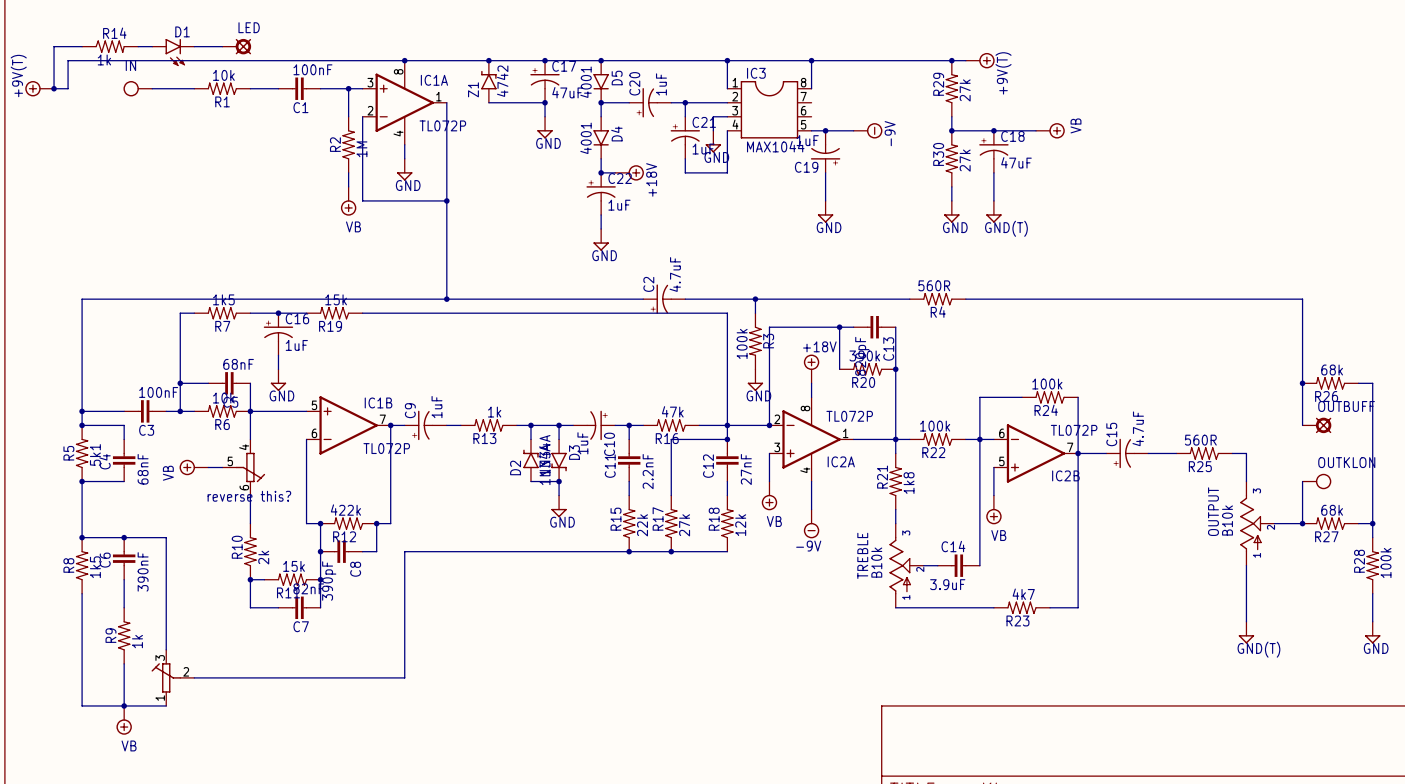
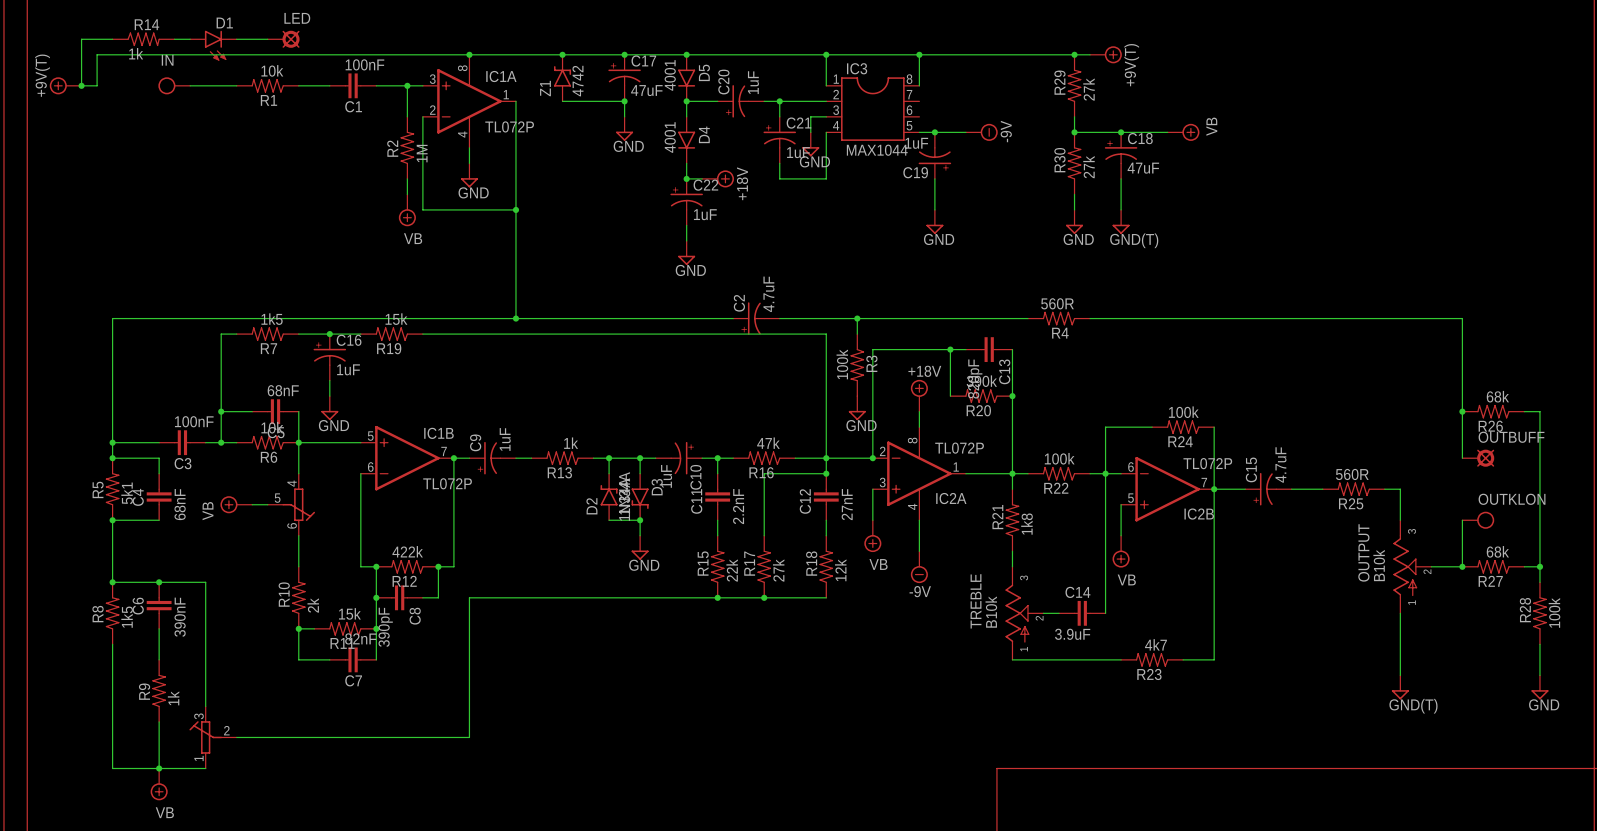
text: reverse this? (249, 496) -> none

